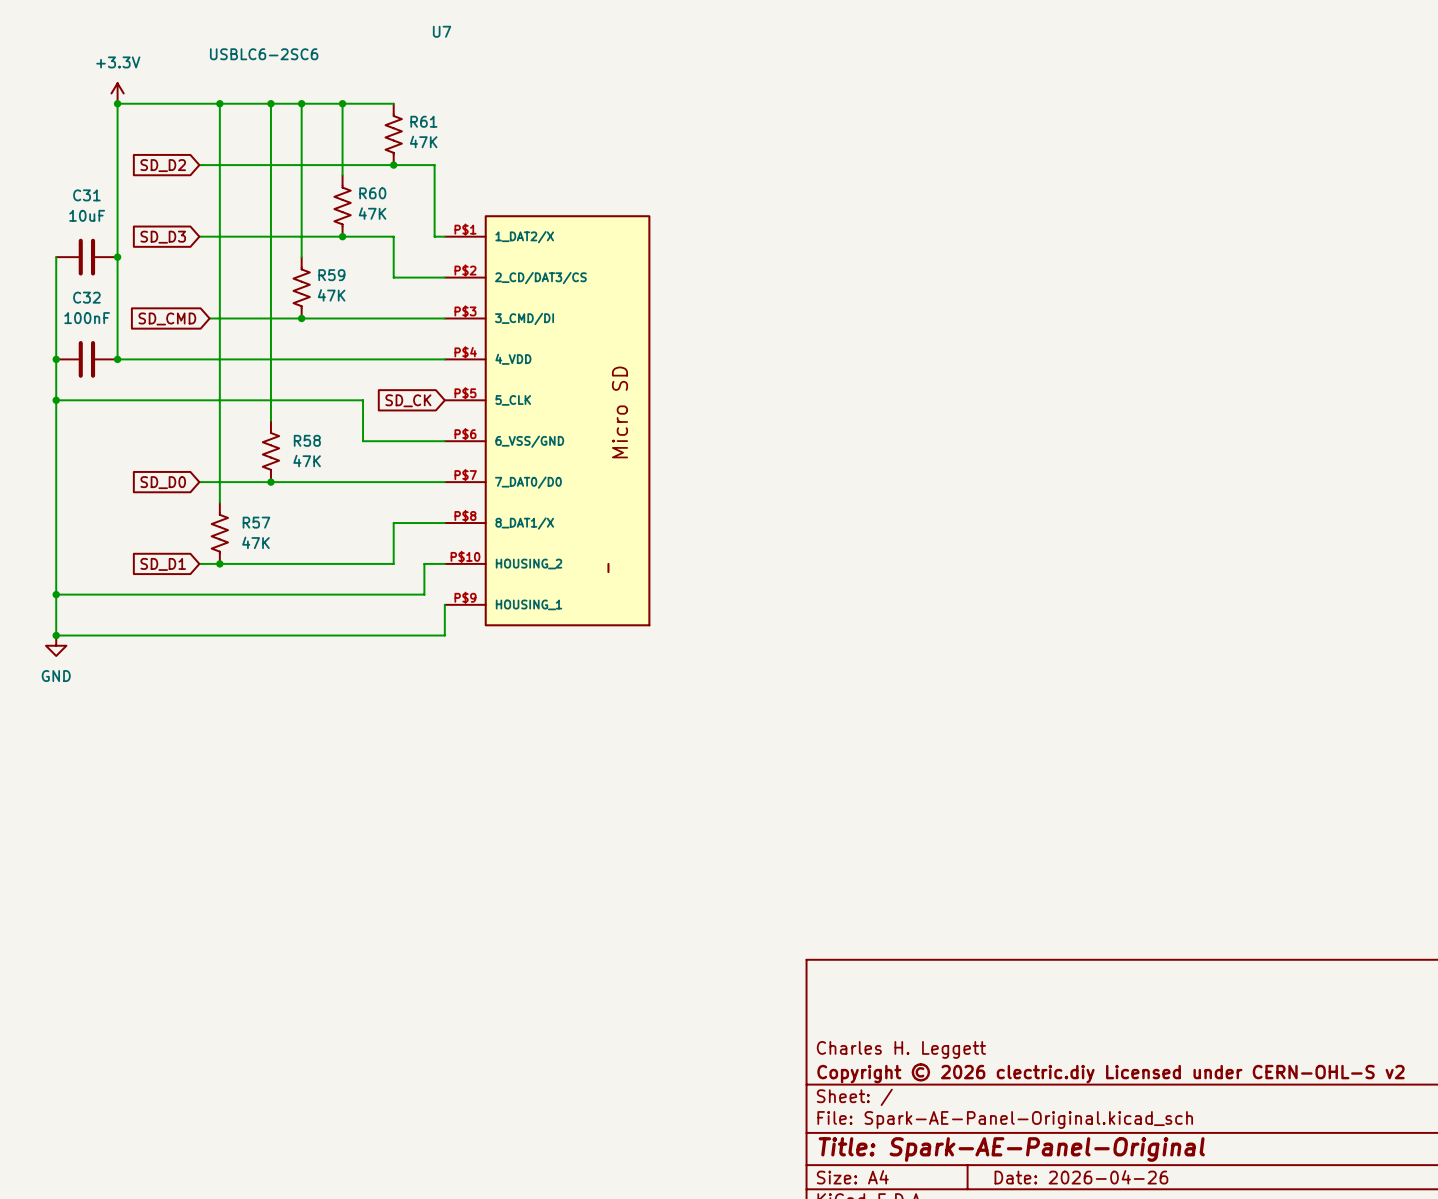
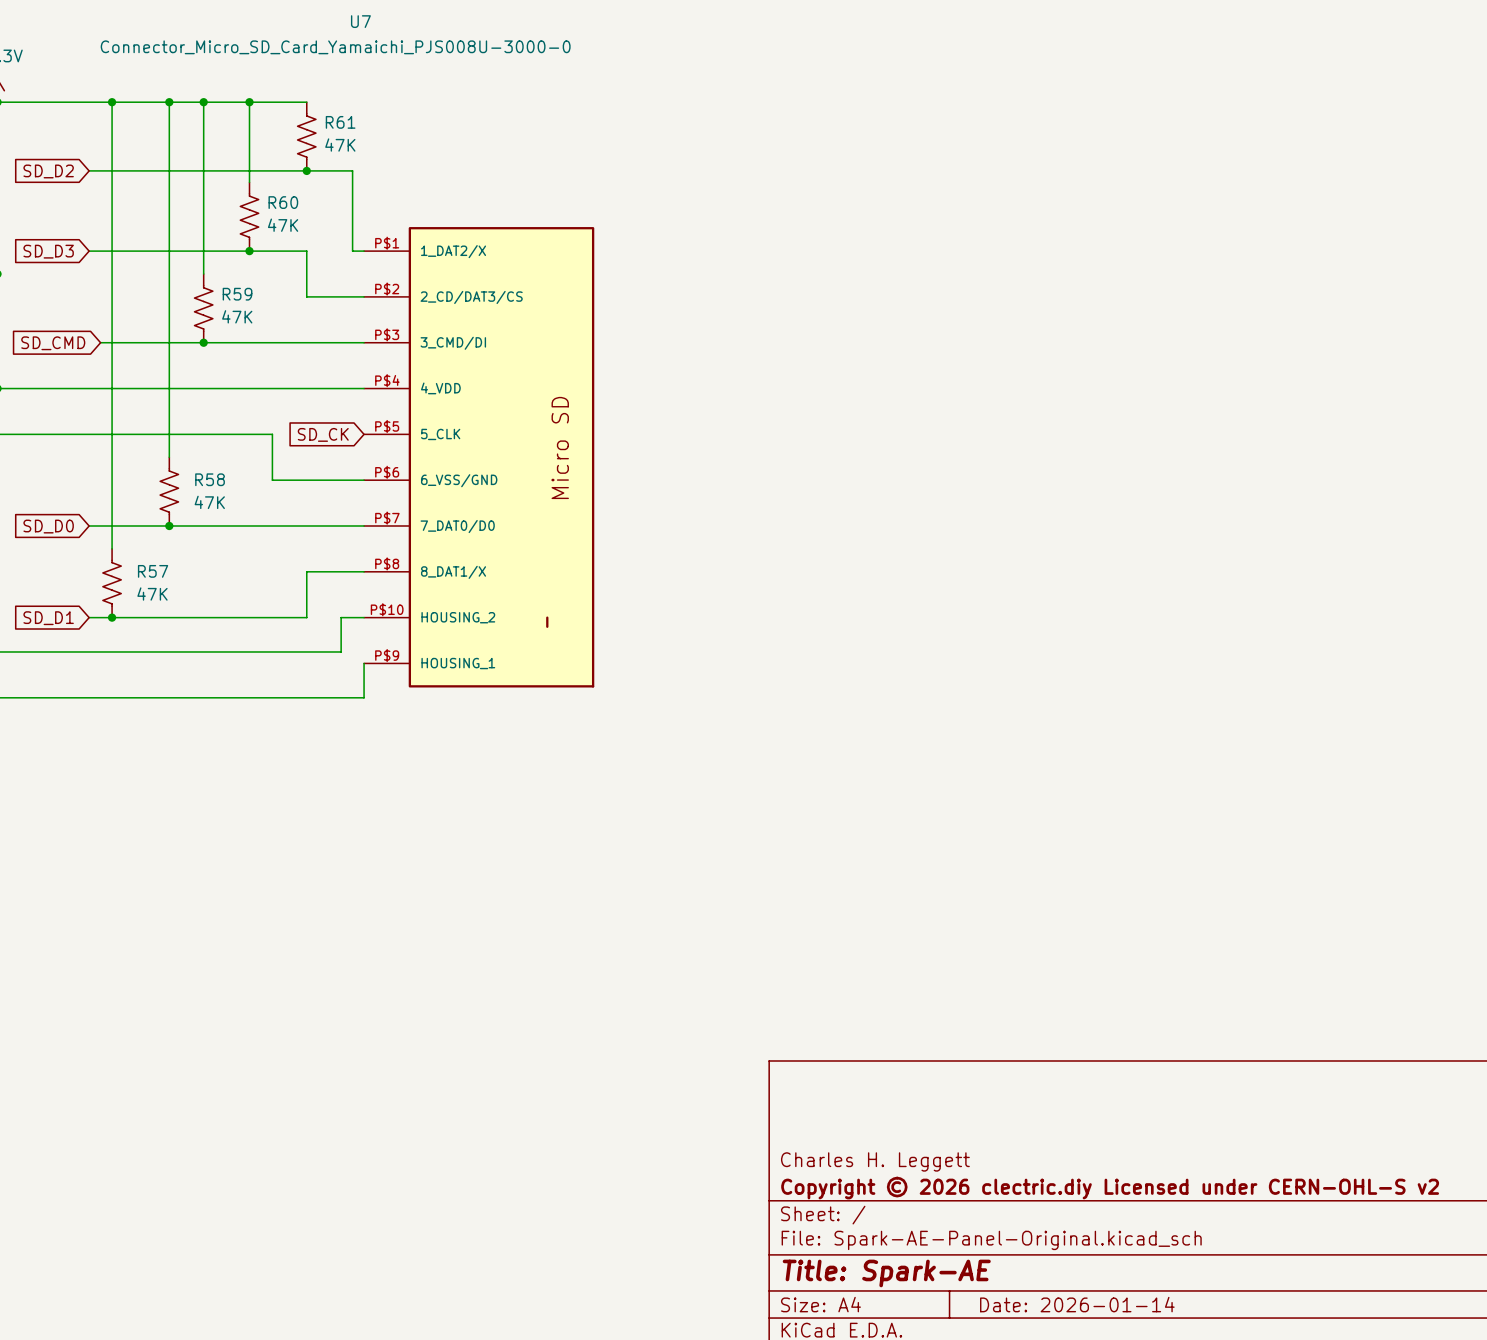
U7 value: USBLC6-2SC6 (264, 54) -> Connector_Micro_SD_Card_Yamaichi_PJS008U-3000-0 (335, 47)
title block: Title: Spark-AE-Panel-Original (1011, 1149) -> Title: Spark-AE (886, 1273)
title block: Date: 2026-04-26 (1081, 1177) -> Date: 2026-01-14 (1077, 1304)

